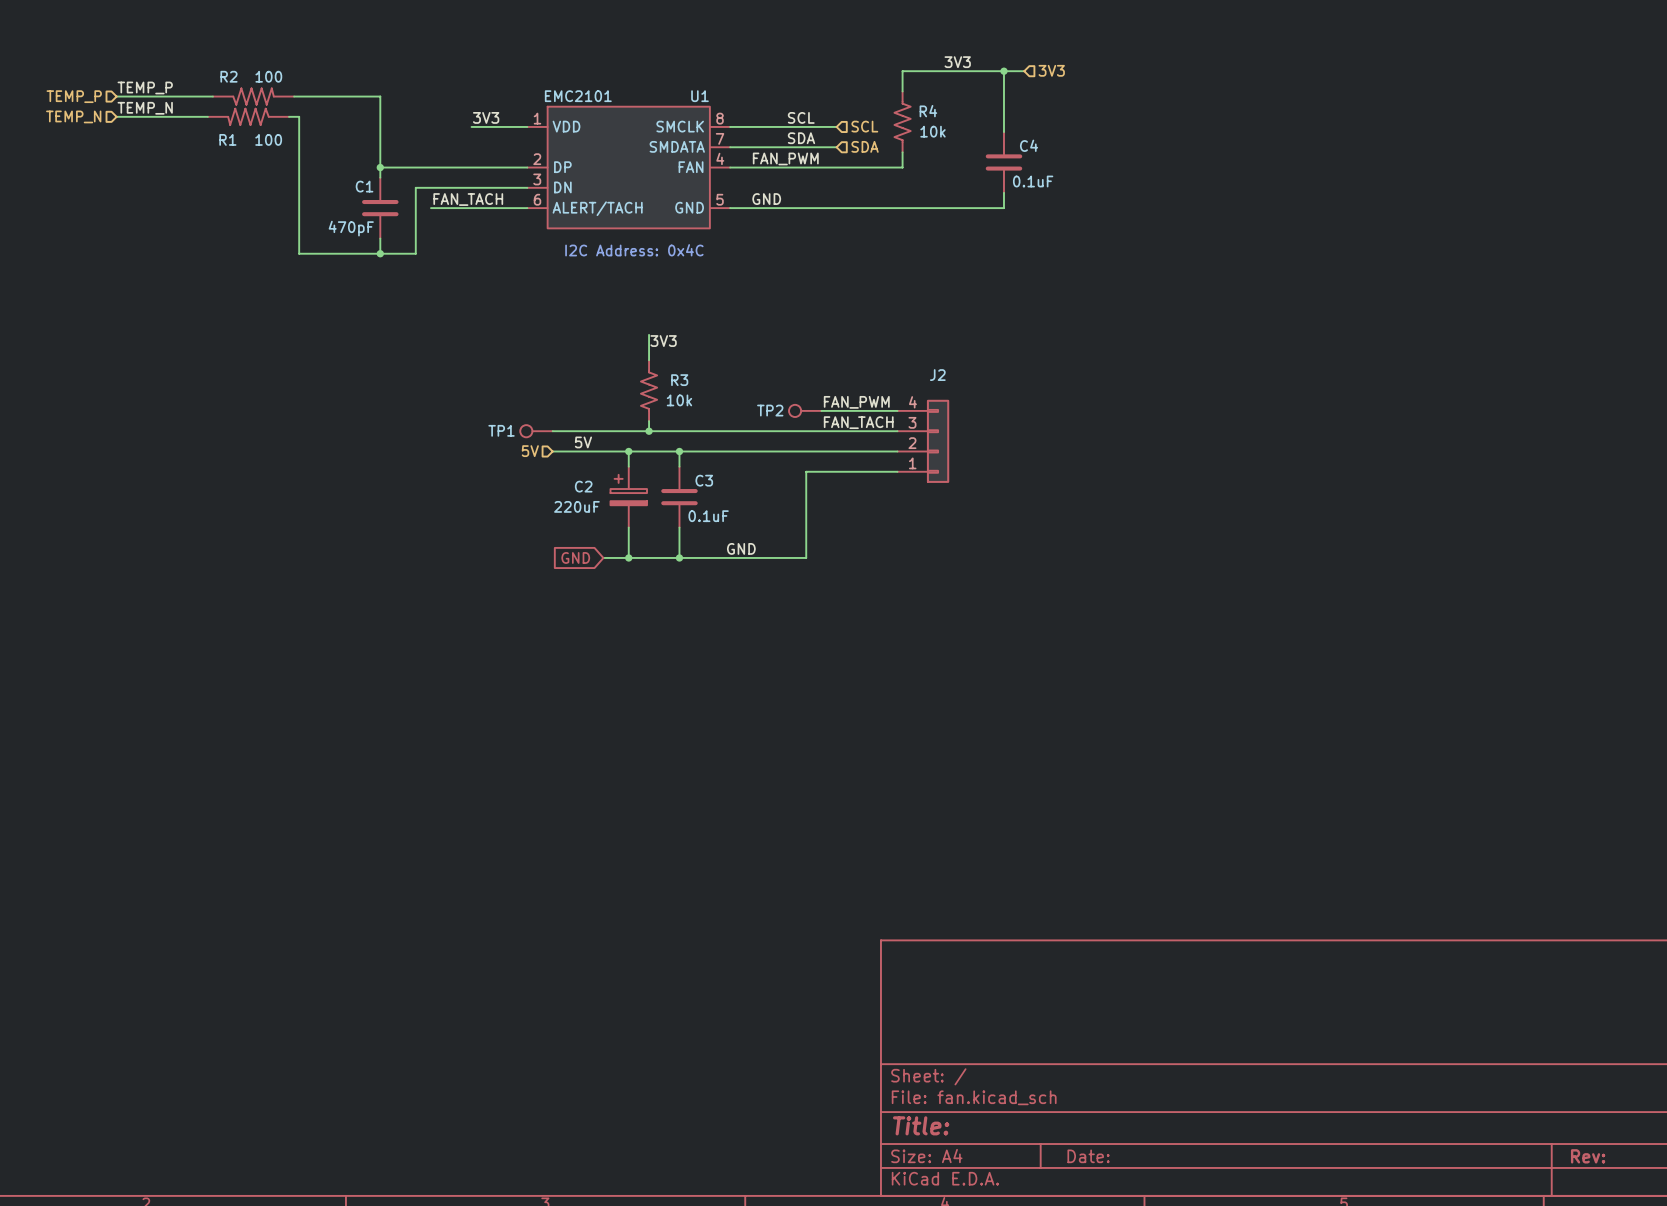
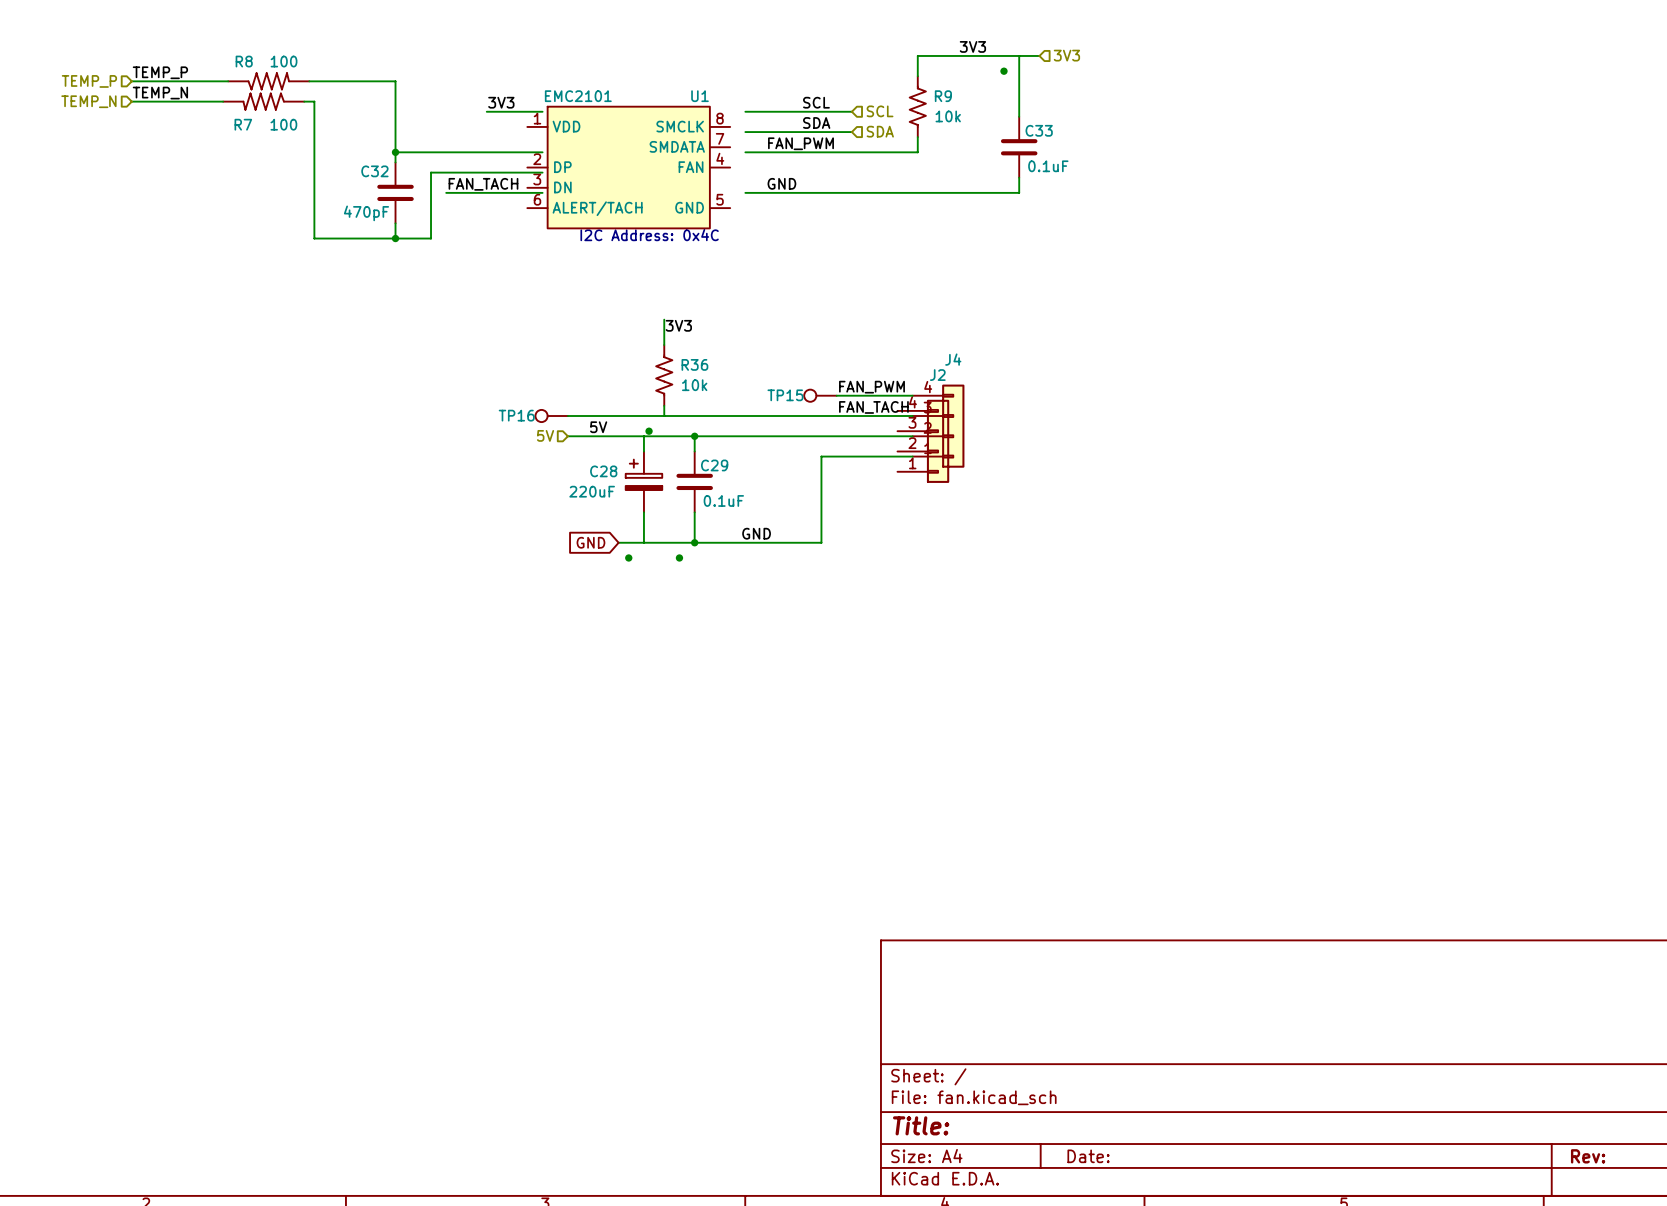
label position: 3V3 (957, 62) -> 3V3 (972, 46)
hierarchical label position: 3V3 (1051, 70) -> 3V3 (1066, 55)
wire: (1003, 71) (1003, 132) -> (1019, 55) (1019, 116)
wire: (1024, 71) (902, 71) (902, 91) -> (1039, 55) (917, 55) (917, 76)
R8: none -> 100 (268, 81)
label position: TEMP_P (145, 87) -> TEMP_P (160, 72)
hierarchical label position: TEMP_P (74, 96) -> TEMP_P (89, 81)
wire: (116, 96) (212, 96) -> (131, 81) (228, 81)
R2: 100 (253, 96) -> none
wire: (294, 96) (380, 96) (380, 177) -> (309, 81) (395, 81) (395, 162)
R7: none -> 100 (263, 101)
R9: none -> 10k (917, 106)
label position: TEMP_N (145, 108) -> TEMP_N (160, 93)
hierarchical label position: TEMP_N (73, 116) -> TEMP_N (88, 101)
wire: (116, 116) (207, 116) -> (131, 101) (223, 101)
R1: 100 (248, 116) -> none
wire: (289, 116) (299, 116) (299, 253) (415, 253) (415, 187) (527, 187) -> (304, 101) (314, 101) (314, 238) (431, 238) (431, 172) (542, 172)
label position: 3V3 (486, 117) -> 3V3 (501, 102)
label position: SCL (801, 117) -> SCL (816, 102)
R4: 10k (902, 121) -> none
wire: (471, 126) (527, 126) -> (486, 111) (542, 111)
wire: (730, 126) (836, 126) -> (745, 111) (851, 111)
hierarchical label position: SCL (864, 126) -> SCL (880, 111)
label position: SDA (801, 138) -> SDA (816, 122)
hierarchical label position: SDA (865, 146) -> SDA (880, 131)
wire: (730, 147) (836, 147) -> (745, 132) (851, 132)
C33: none -> 0.1uF (1019, 147)
wire: (902, 152) (902, 167) (730, 167) -> (917, 137) (917, 152) (745, 152)
label position: FAN_PWM (785, 158) -> FAN_PWM (801, 143)
C4: 0.1uF (1003, 162) -> none
wire: (380, 167) (527, 167) -> (395, 152) (542, 152)
junction position: (380, 167) -> (395, 152)
C32: none -> 470pF (395, 192)
wire: (1003, 192) (1003, 208) (730, 208) -> (1019, 177) (1019, 192) (745, 192)
label position: FAN_TACH (468, 199) -> FAN_TACH (483, 184)
label position: GND (766, 199) -> GND (781, 183)
C1: 470pF (380, 208) -> none
wire: (431, 208) (527, 208) -> (446, 192) (542, 192)
wire: (380, 238) (380, 253) -> (395, 223) (395, 238)
text position: I2C Address: 0x4C (634, 250) -> I2C Address: 0x4C (649, 235)
junction position: (380, 253) -> (395, 238)
wire: (649, 334) (649, 360) -> (664, 319) (664, 345)
label position: 3V3 (663, 341) -> 3V3 (678, 325)
R36: none -> 10k (664, 375)
R3: 10k (649, 390) -> none
TP15: none -> (820, 395)
label position: FAN_PWM (856, 402) -> FAN_PWM (871, 387)
TP2: (805, 410) -> none
wire: (821, 410) (897, 410) -> (836, 395) (912, 395)
TP16: none -> (551, 416)
wire: (649, 421) (649, 431) -> (664, 405) (664, 416)
label position: FAN_TACH (858, 422) -> FAN_TACH (873, 407)
J4: none -> (938, 426)
TP1: (536, 431) -> none
wire: (552, 431) (897, 431) -> (567, 416) (912, 416)
label position: 5V (583, 442) -> 5V (598, 427)
hierarchical label position: 5V (530, 451) -> 5V (545, 435)
wire: (552, 451) (897, 451) -> (567, 436) (912, 436)
wire: (628, 451) (628, 466) -> (643, 436) (643, 451)
junction: (628, 451) -> none
wire: (679, 451) (679, 466) -> (694, 436) (694, 451)
junction position: (679, 451) -> (694, 436)
wire: (897, 471) (806, 471) (806, 557) (603, 557) -> (912, 456) (821, 456) (821, 542) (618, 542)
C28: none -> 220uF (643, 481)
C29: none -> 0.1uF (694, 481)
C2: 220uF (628, 497) -> none
C3: 0.1uF (679, 497) -> none
wire: (628, 527) (628, 557) -> (643, 512) (643, 542)
wire: (679, 527) (679, 557) -> (694, 512) (694, 542)
junction: none -> (694, 542)
label position: GND (741, 548) -> GND (756, 533)
global label position: GND (575, 557) -> GND (590, 542)

